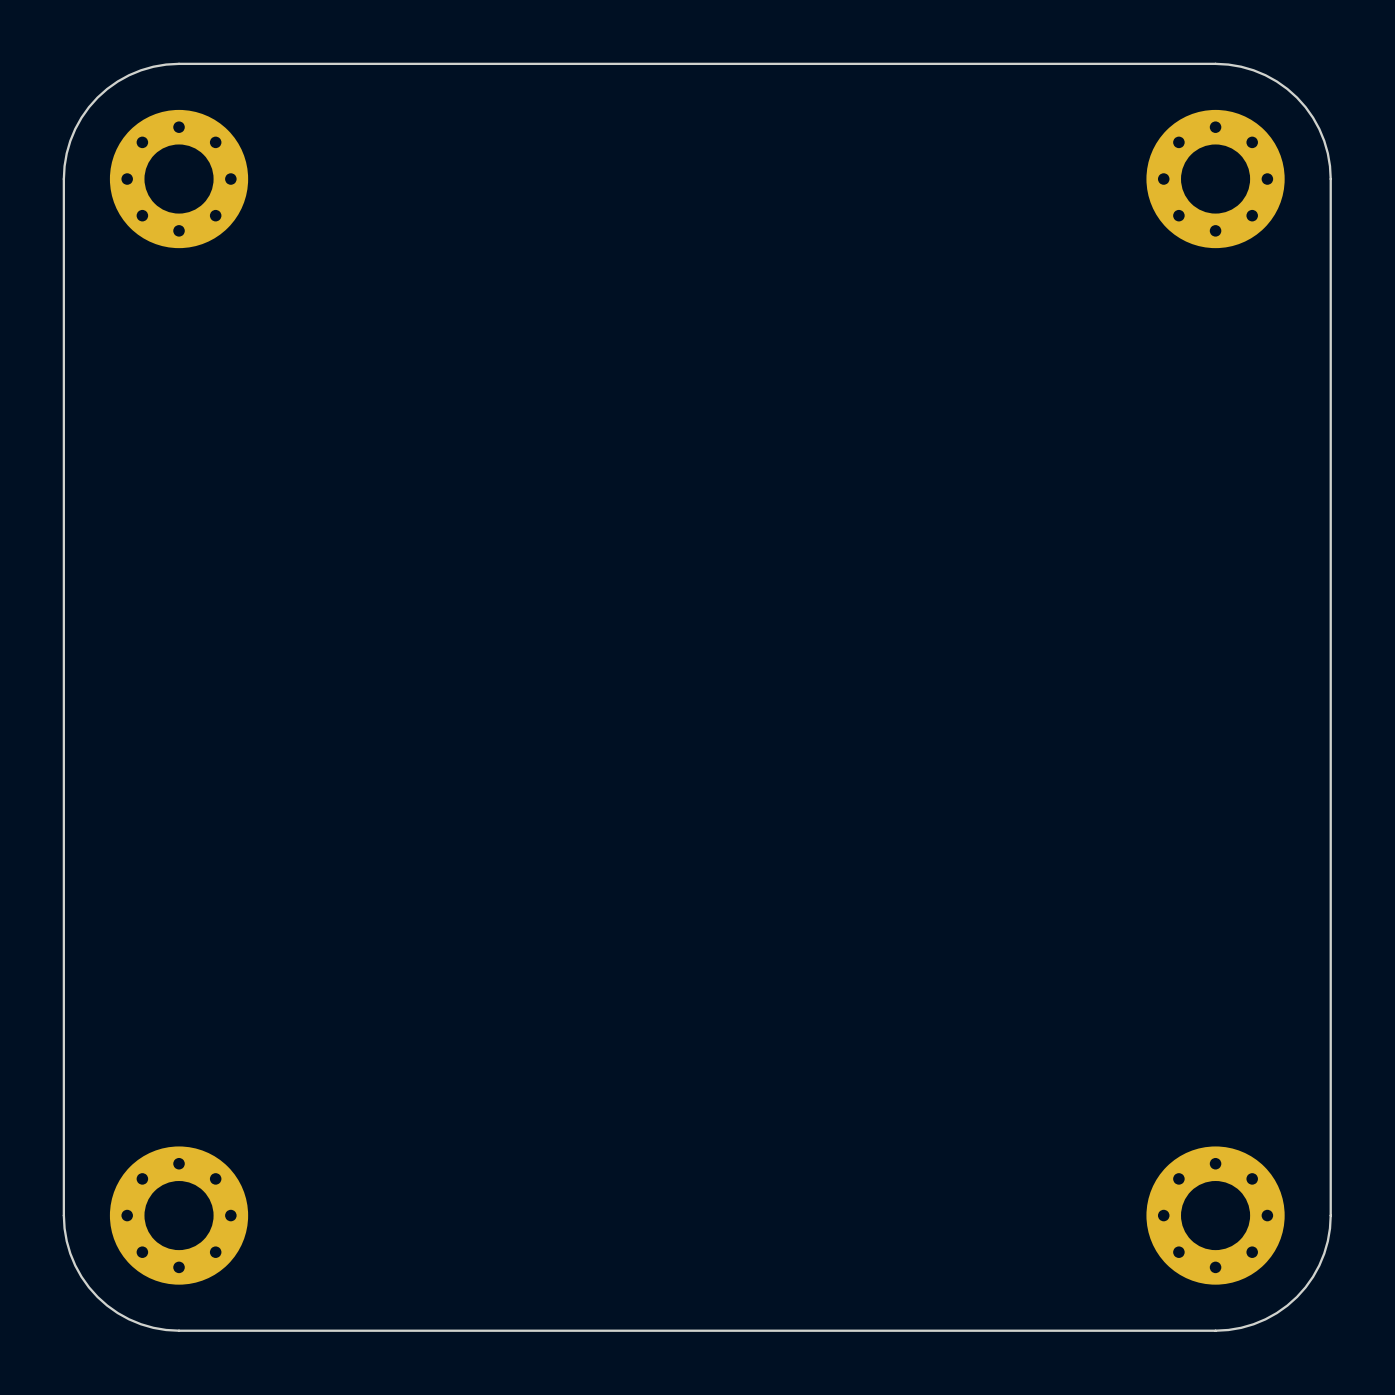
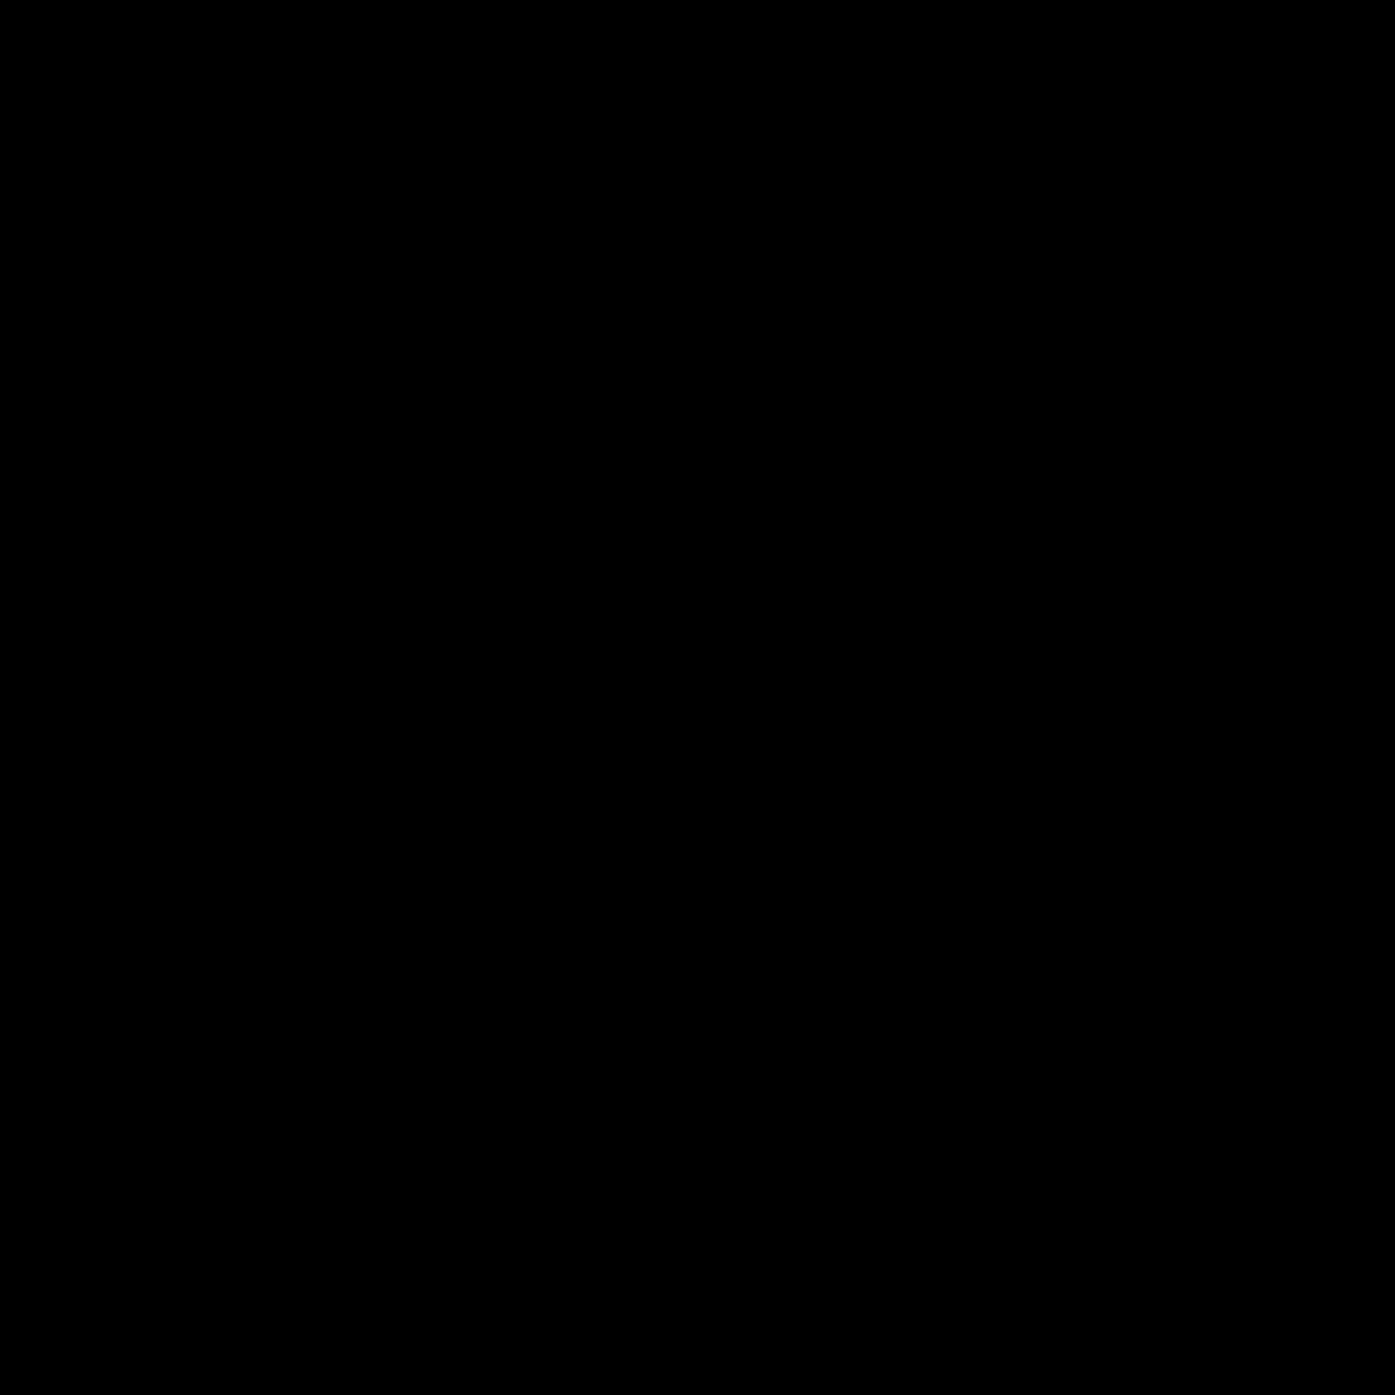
board edge: (179, 63) (1215, 63) (1253, 70) (1276, 81) (1296, 97) (1319, 129) (1327, 153) (1330, 179) (1330, 1215) (1324, 1253) (1313, 1276) (1296, 1296) (1276, 1313) (1253, 1324) (1215, 1330) (179, 1330) (153, 1327) (129, 1319) (97, 1296) (81, 1276) (70, 1253) (63, 1215) (64, 166) (75, 129) (97, 97) (129, 75) (153, 66) (179, 63) -> none
part: (179, 179) -> none
part: (1215, 179) -> none
part: (179, 1215) -> none
part: (1215, 1215) -> none

